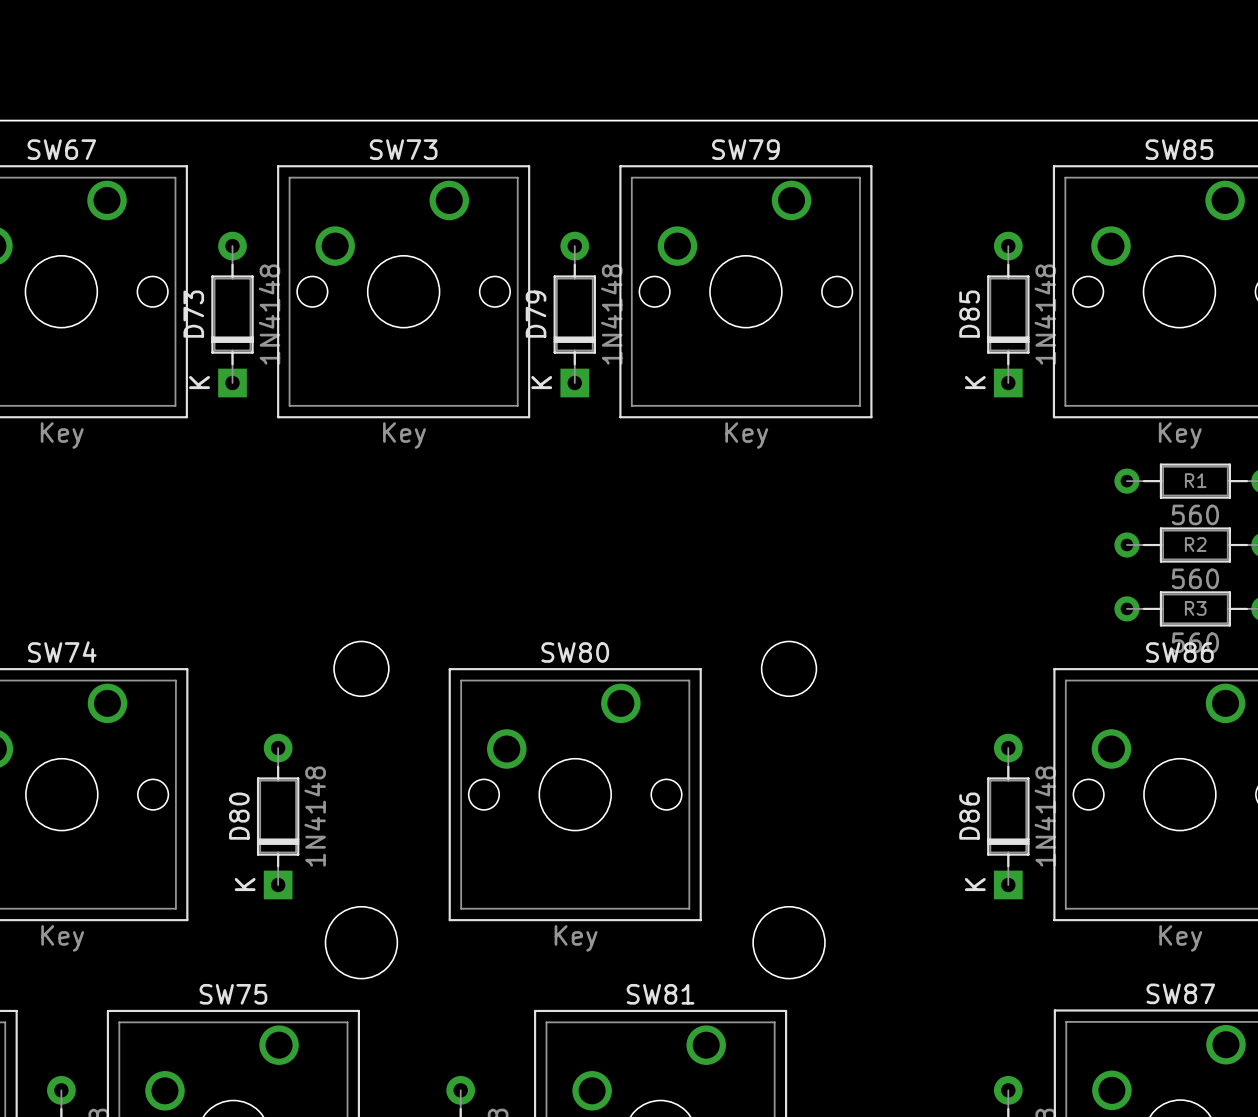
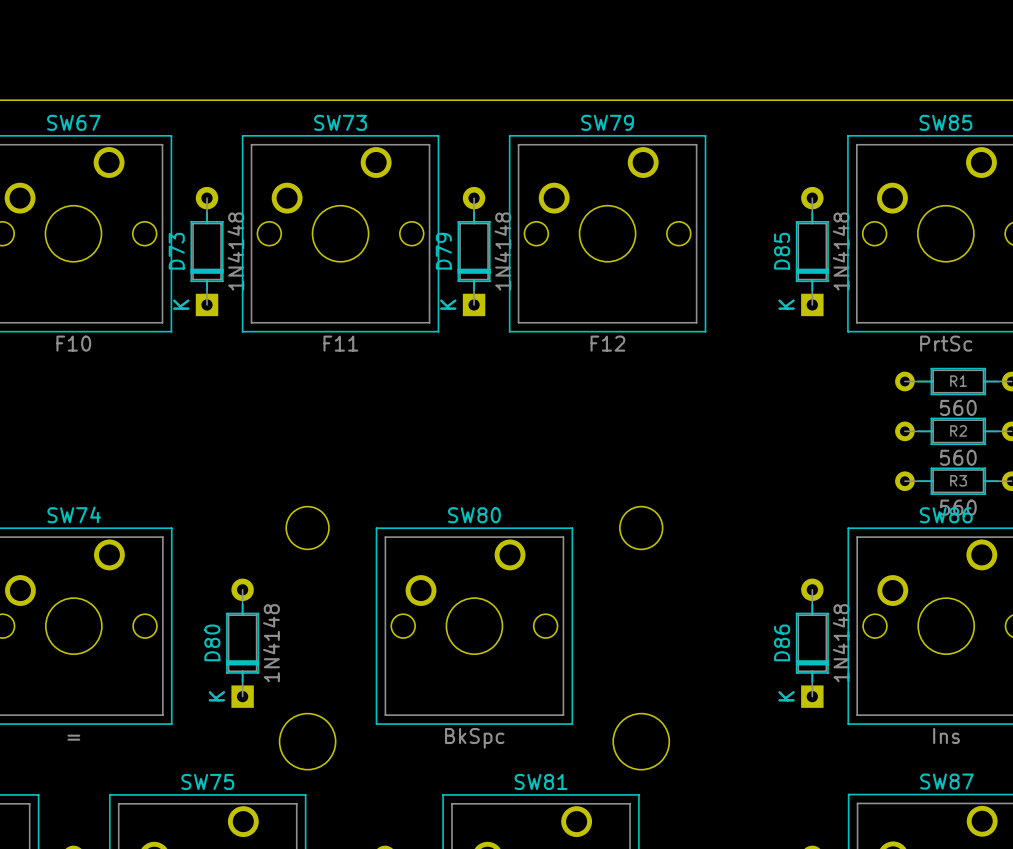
SW67 value: Key (62, 435) -> F10 (73, 343)
SW73 value: Key (404, 435) -> F11 (340, 343)
SW79 value: Key (746, 435) -> F12 (607, 343)
SW85 value: Key (1180, 435) -> PrtSc (946, 343)
SW74 value: Key (62, 938) -> = (73, 737)
SW80 value: Key (576, 938) -> BkSpc (474, 738)
SW86 value: Key (1180, 938) -> Ins (946, 735)

